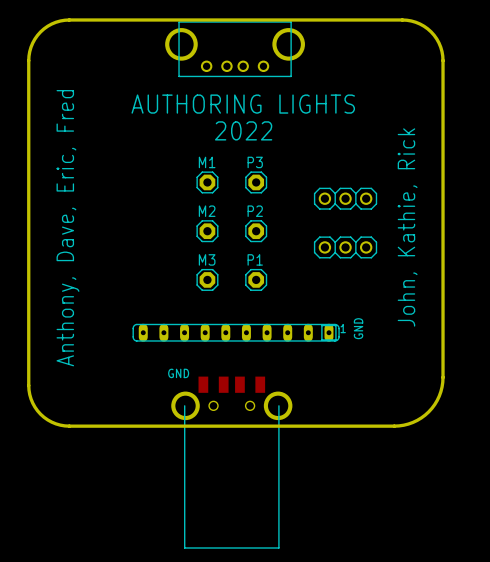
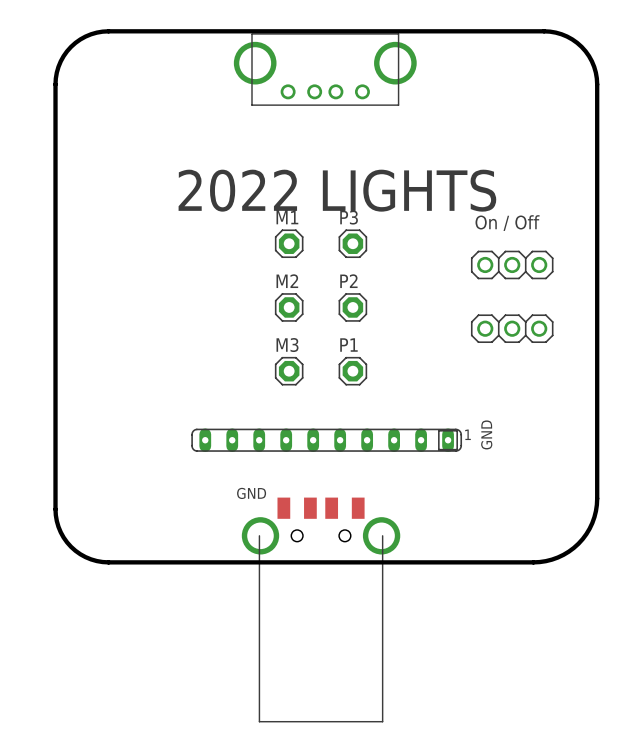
text: AUTHORING LIGHTS (243, 104) -> none
text: 2022 (243, 130) -> none
text: none -> 2022 LIGHTS (337, 190)
text: none -> On / Off (507, 223)
part: (345, 198) -> none
part: none -> (512, 264)
text: John, Kathie, Rick (407, 227) -> none
text: Anthony, Dave, Eric, Fred (68, 228) -> none
part: (345, 247) -> none
part: none -> (512, 328)

